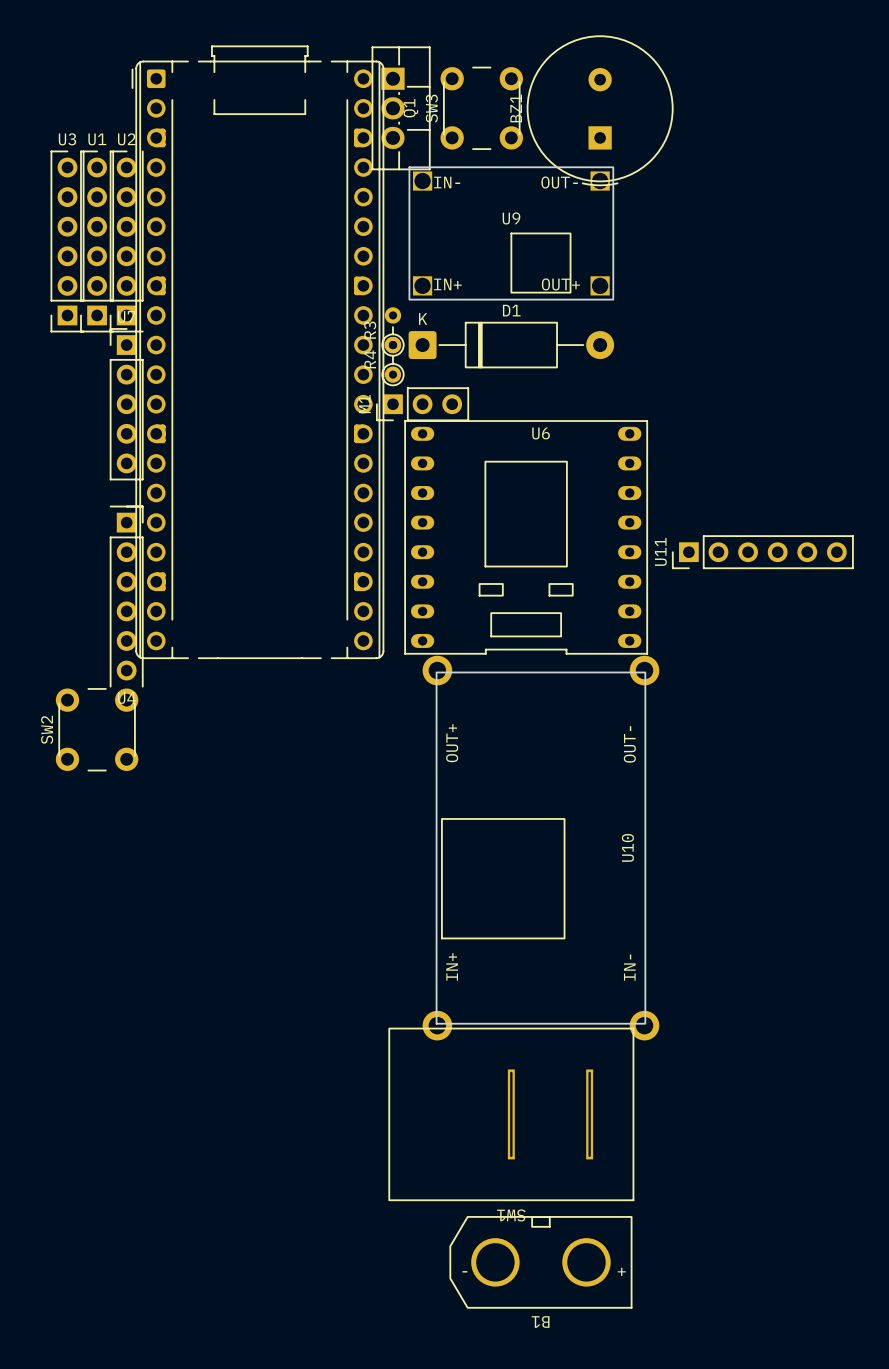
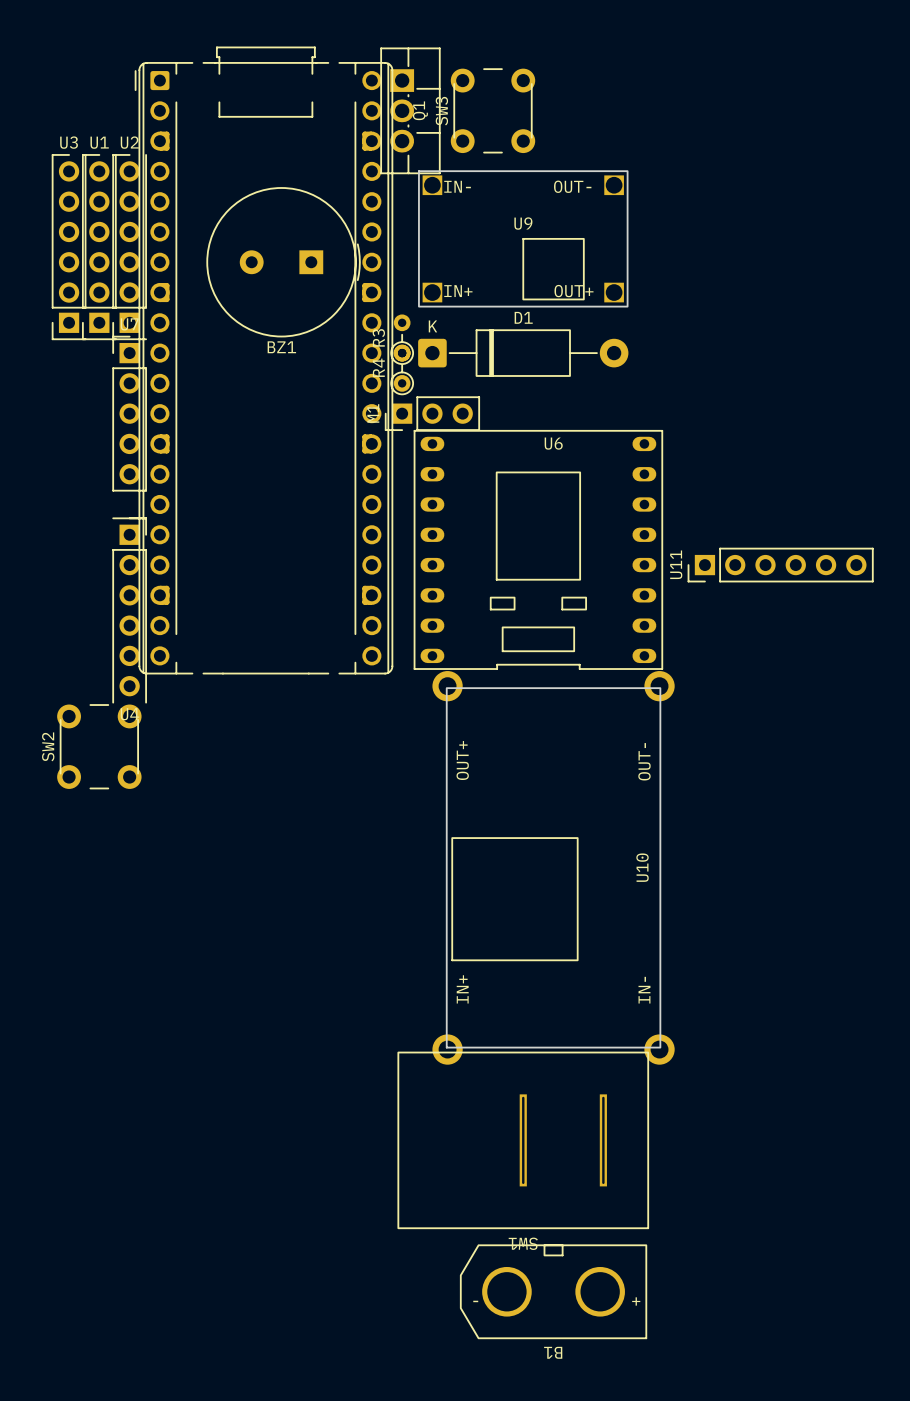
BZ1 rotation: 0° (600, 110) -> 90° counterclockwise (283, 262)
BZ1 position: (600, 110) -> (283, 262)

